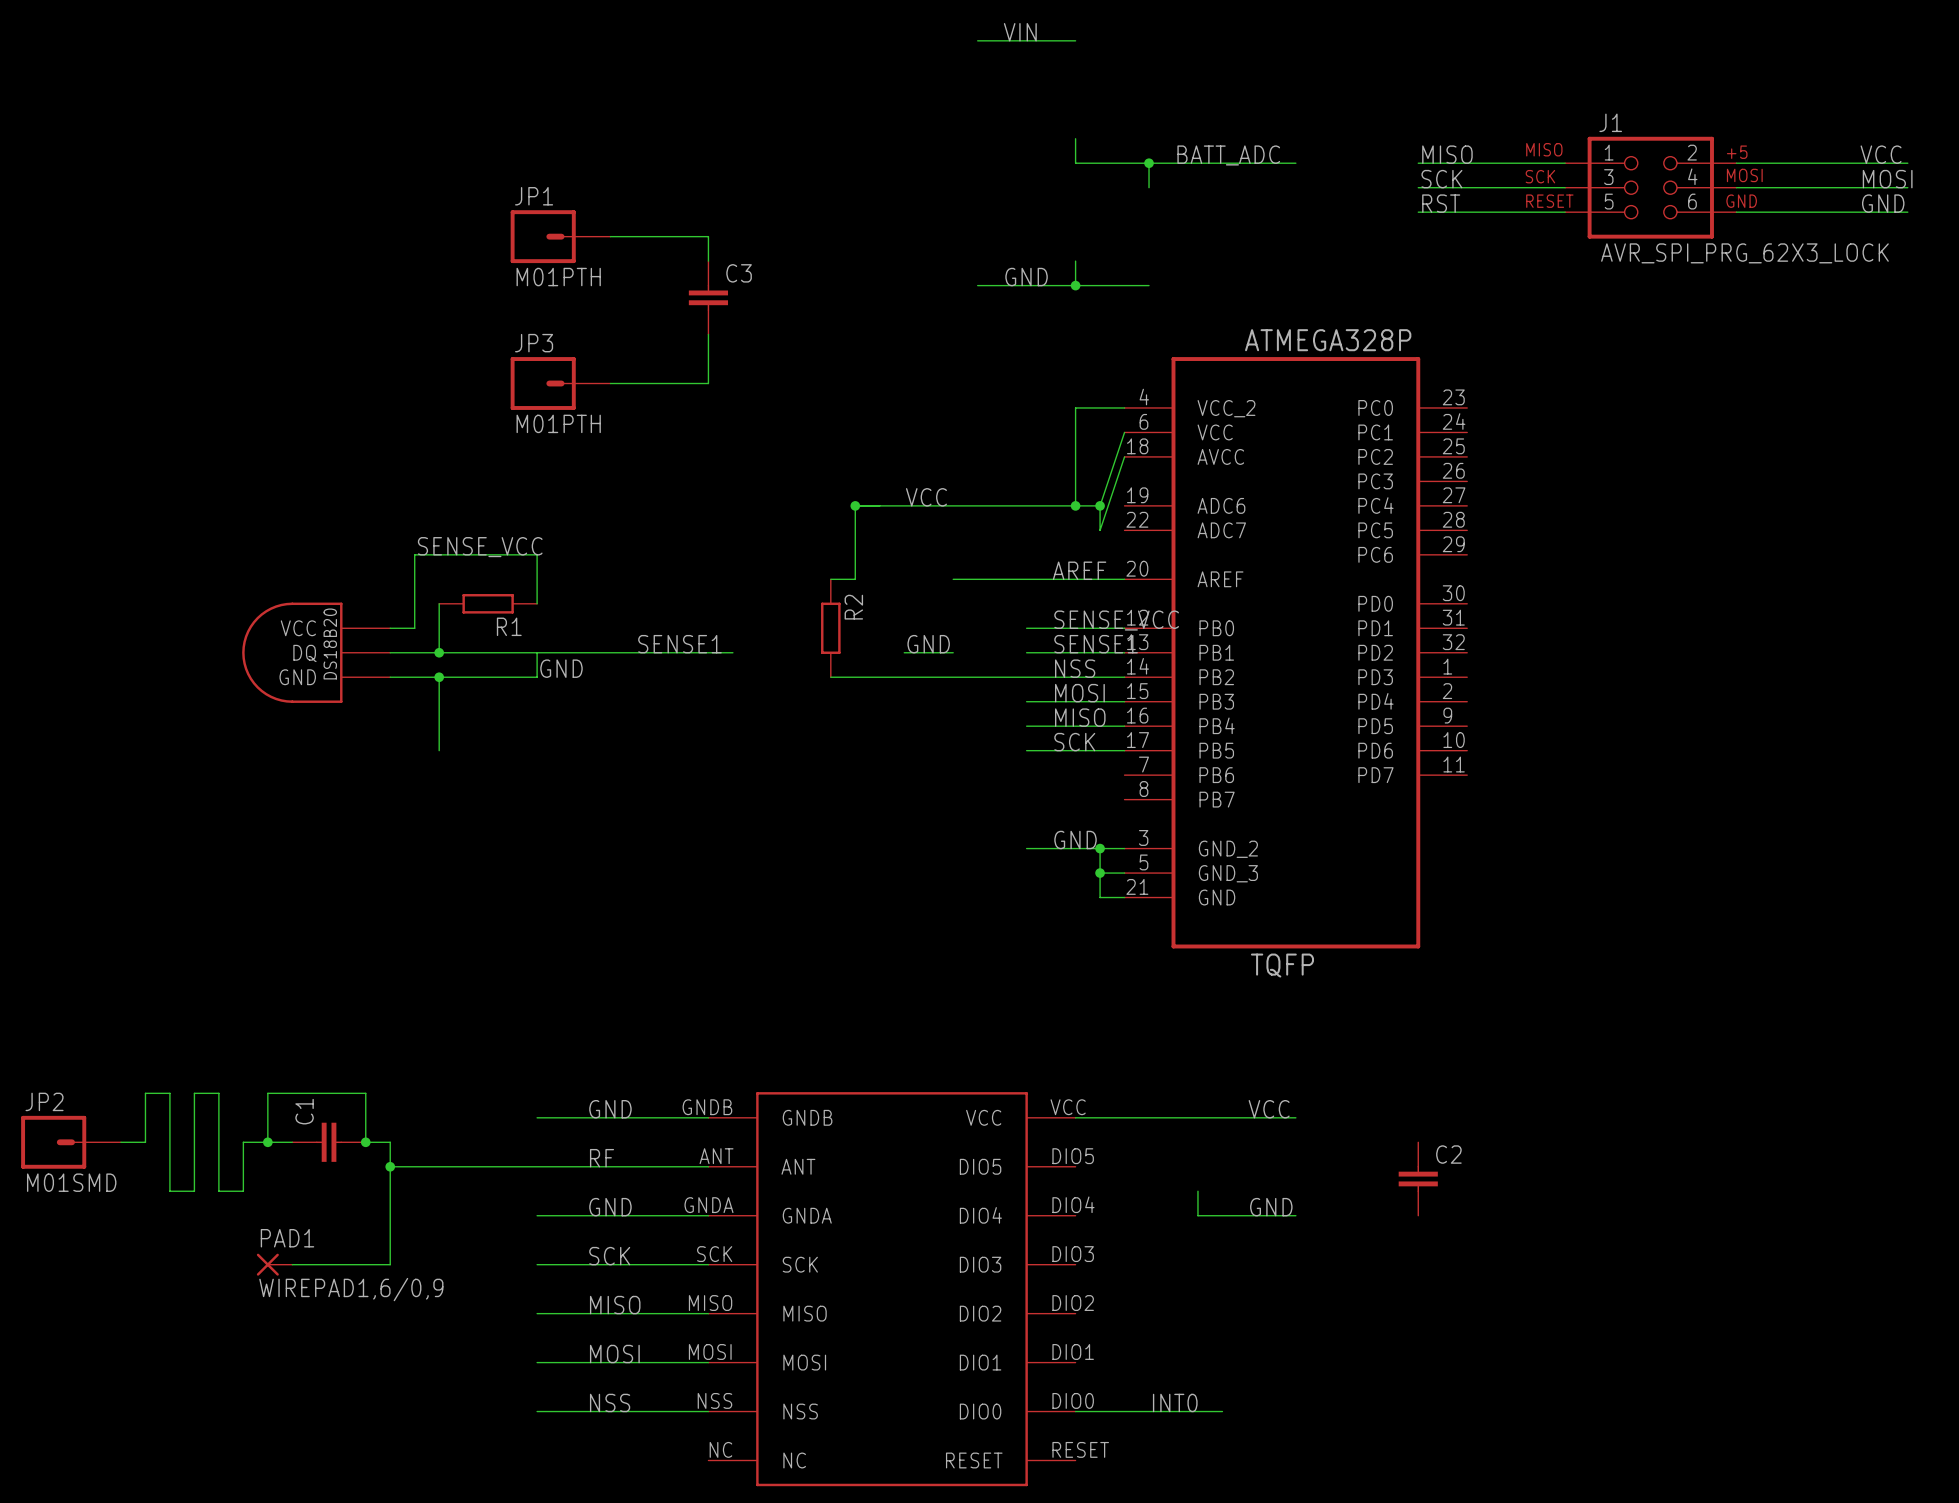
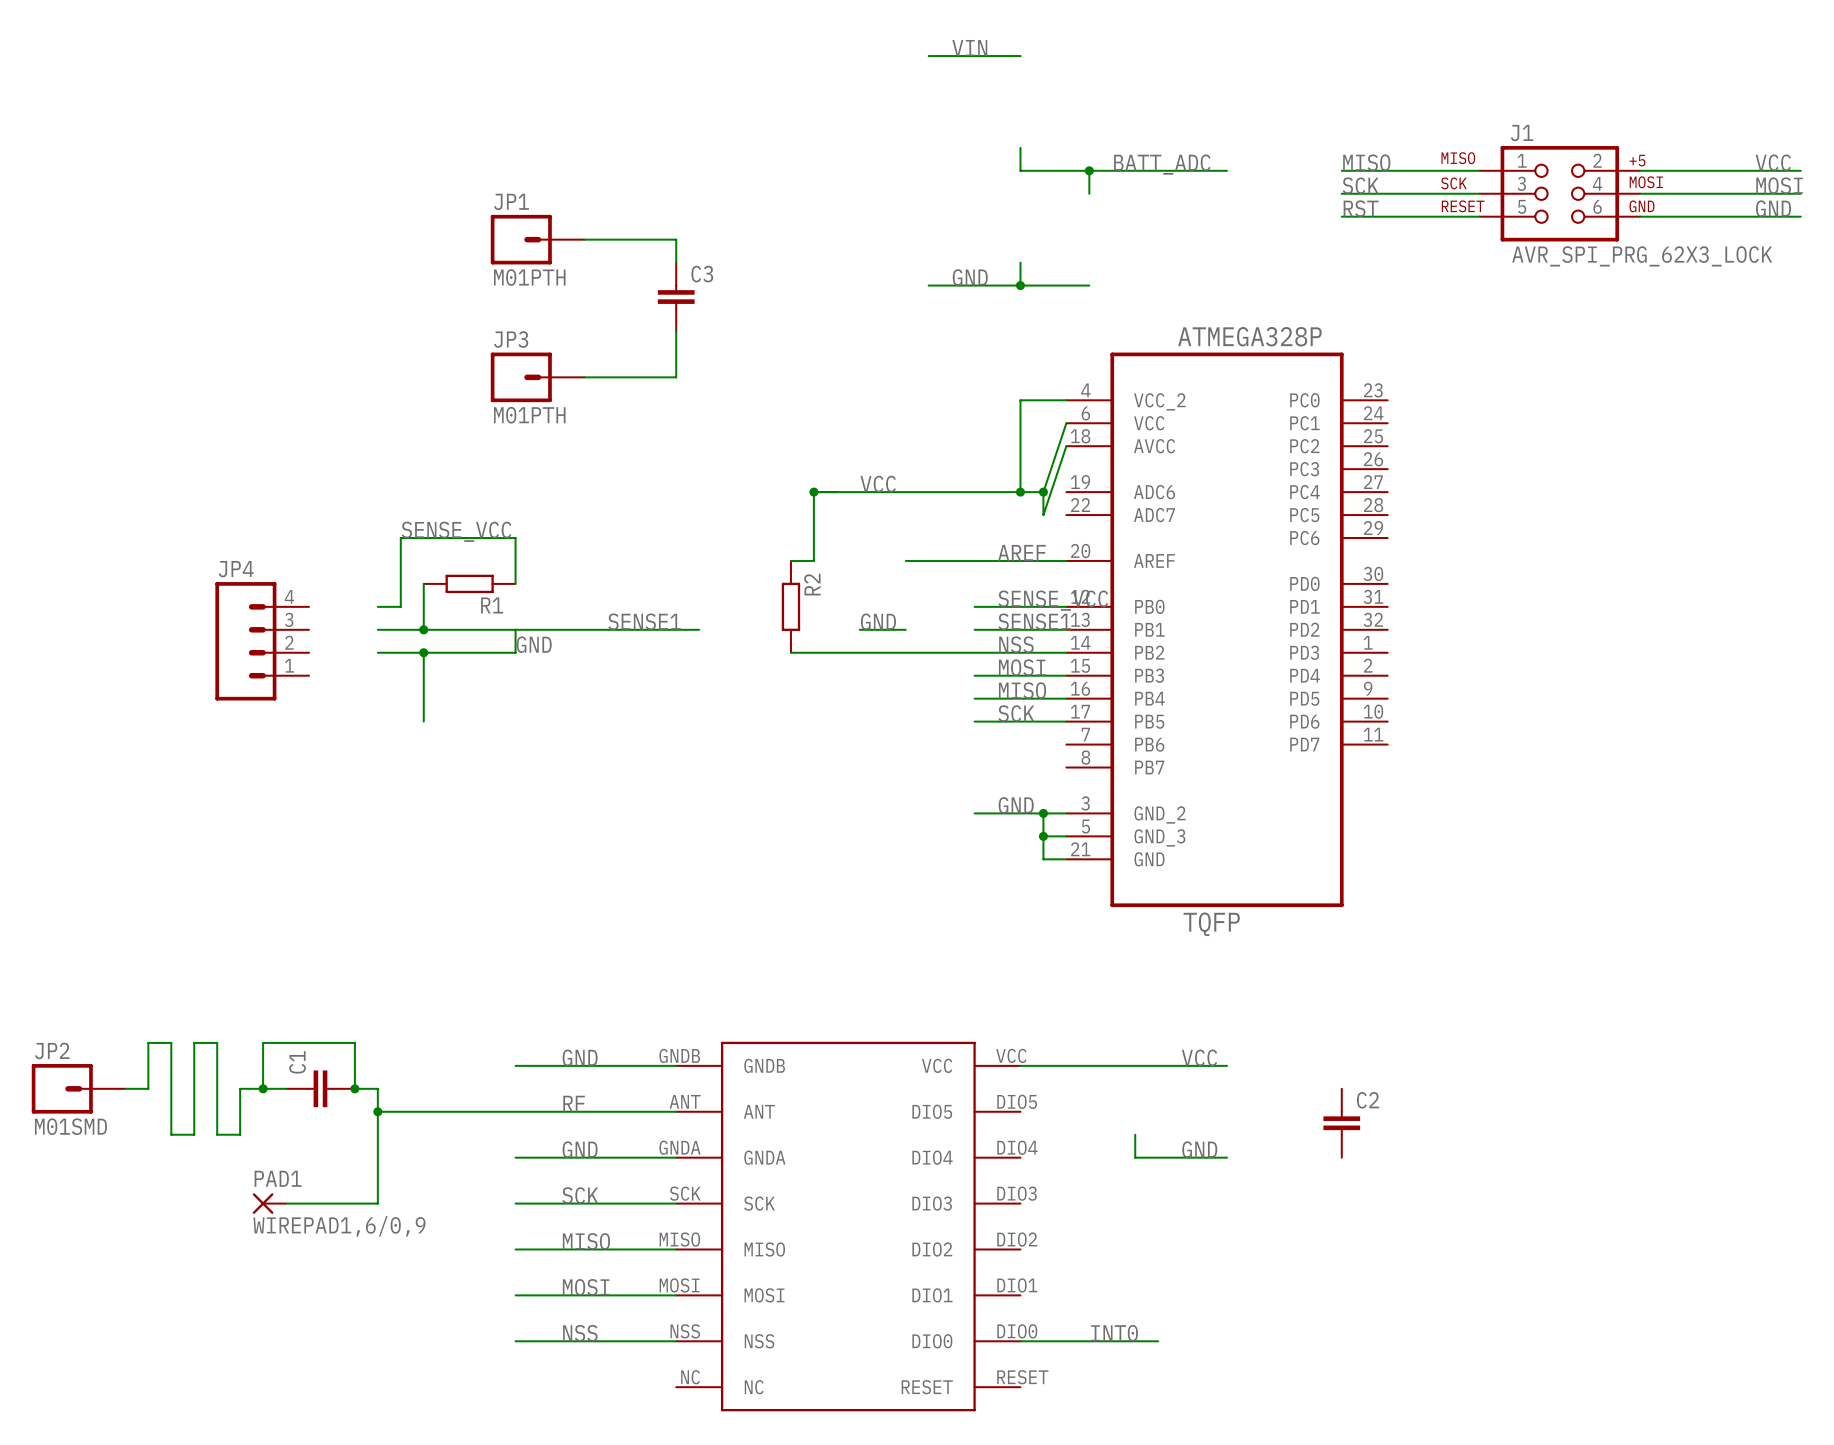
part: (316, 652) -> none
JP4: none -> (262, 641)

